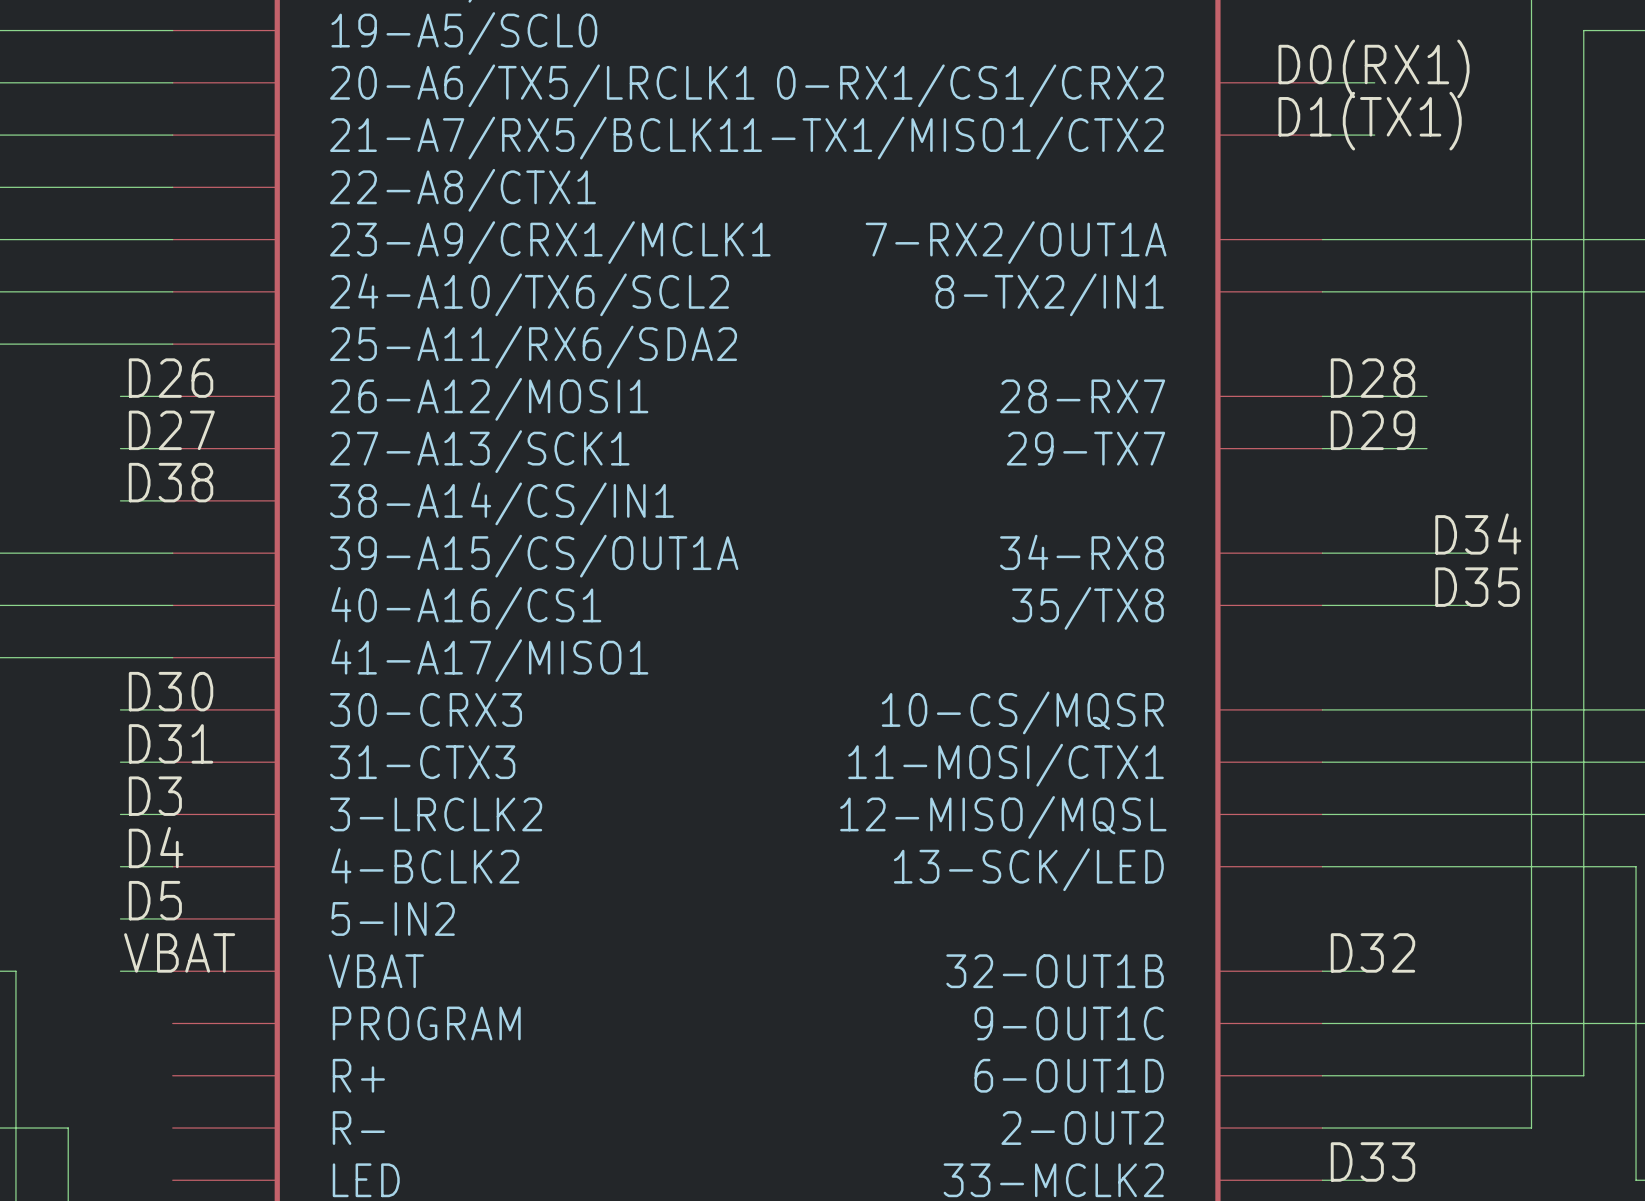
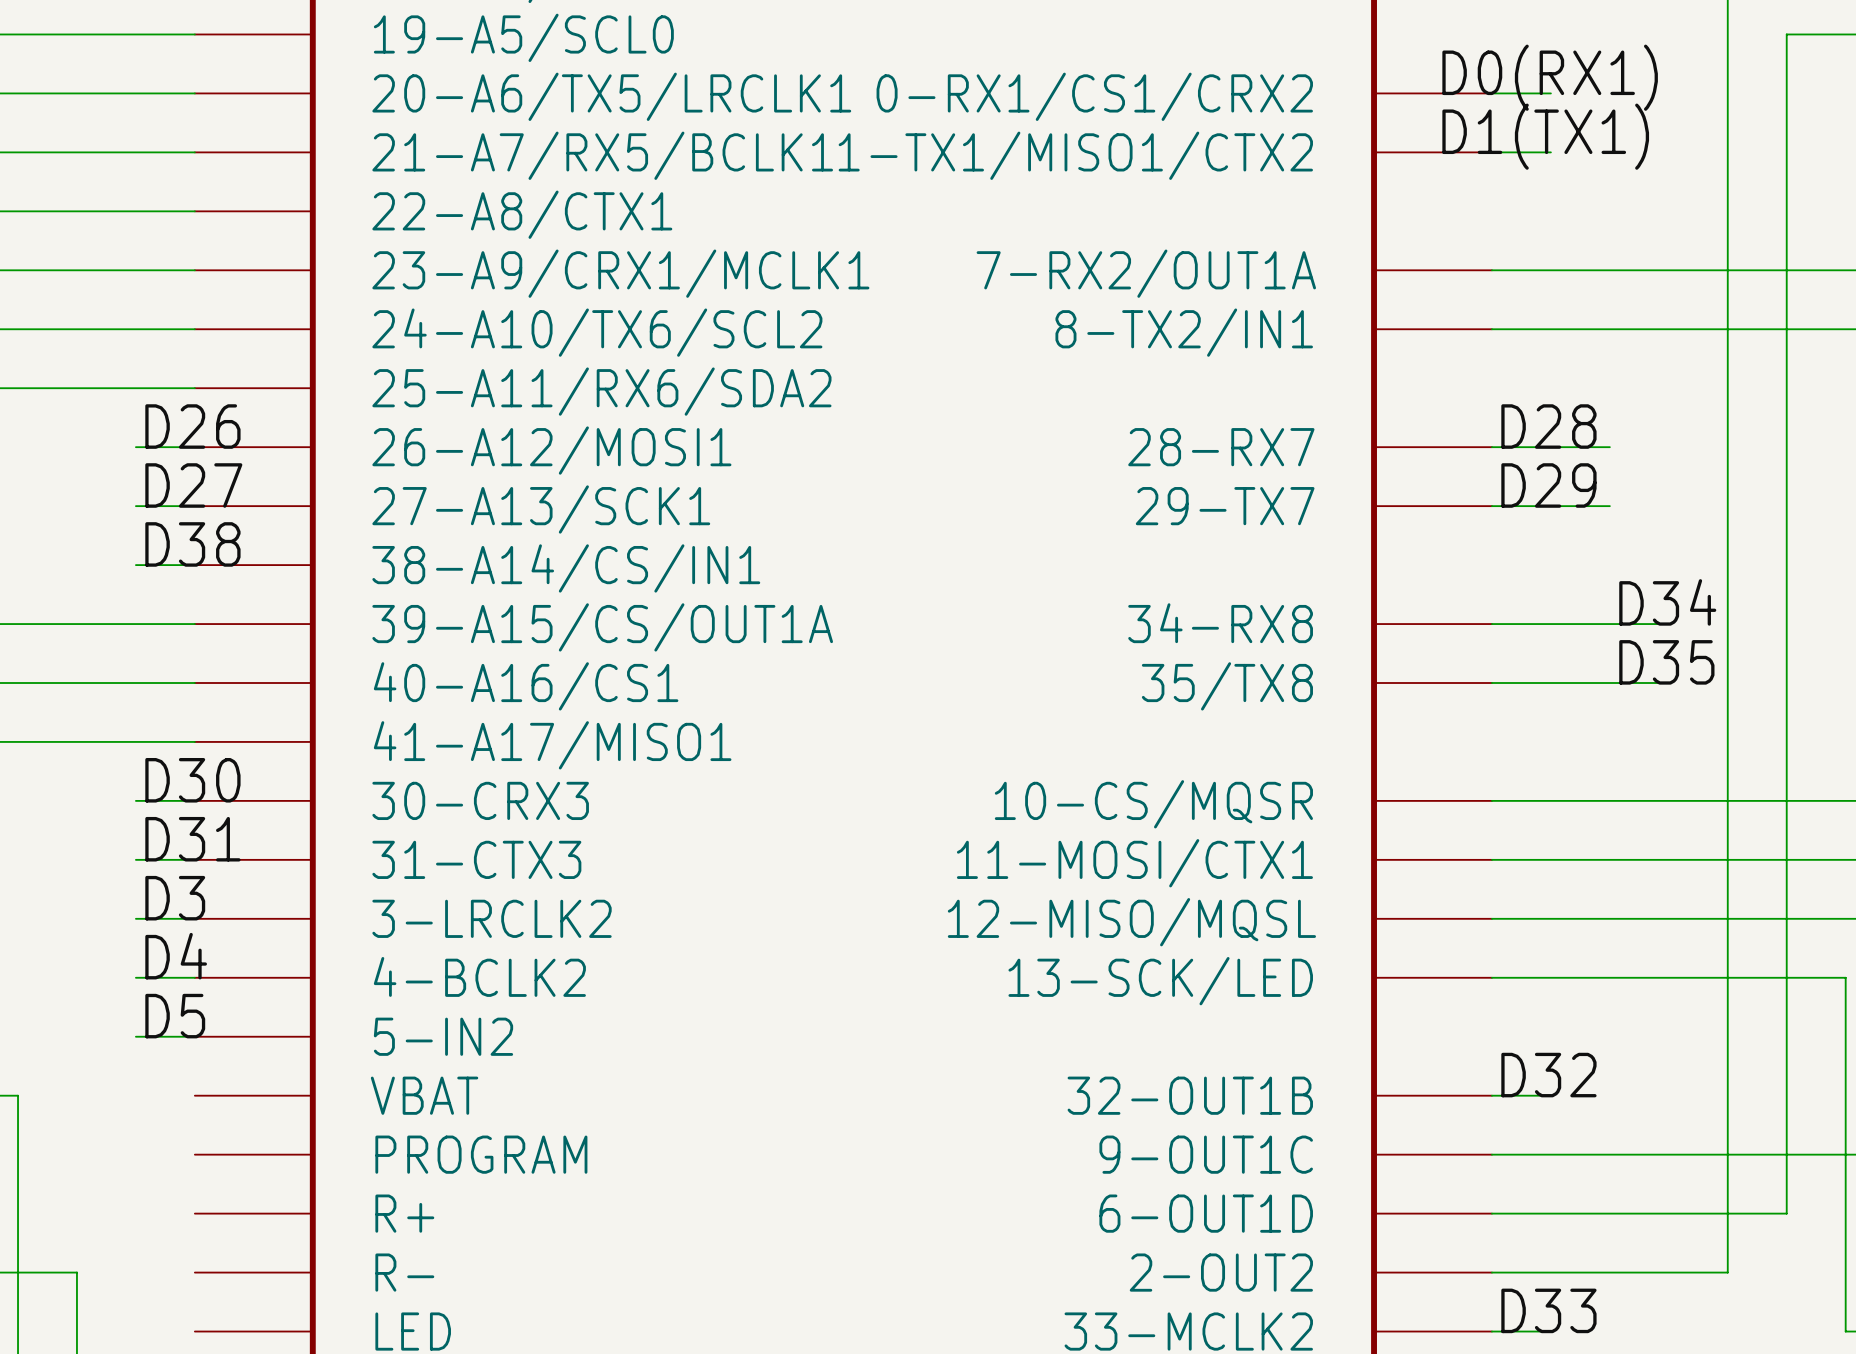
label: VBAT (179, 952) -> none
wire: (120, 971) (172, 971) -> none

